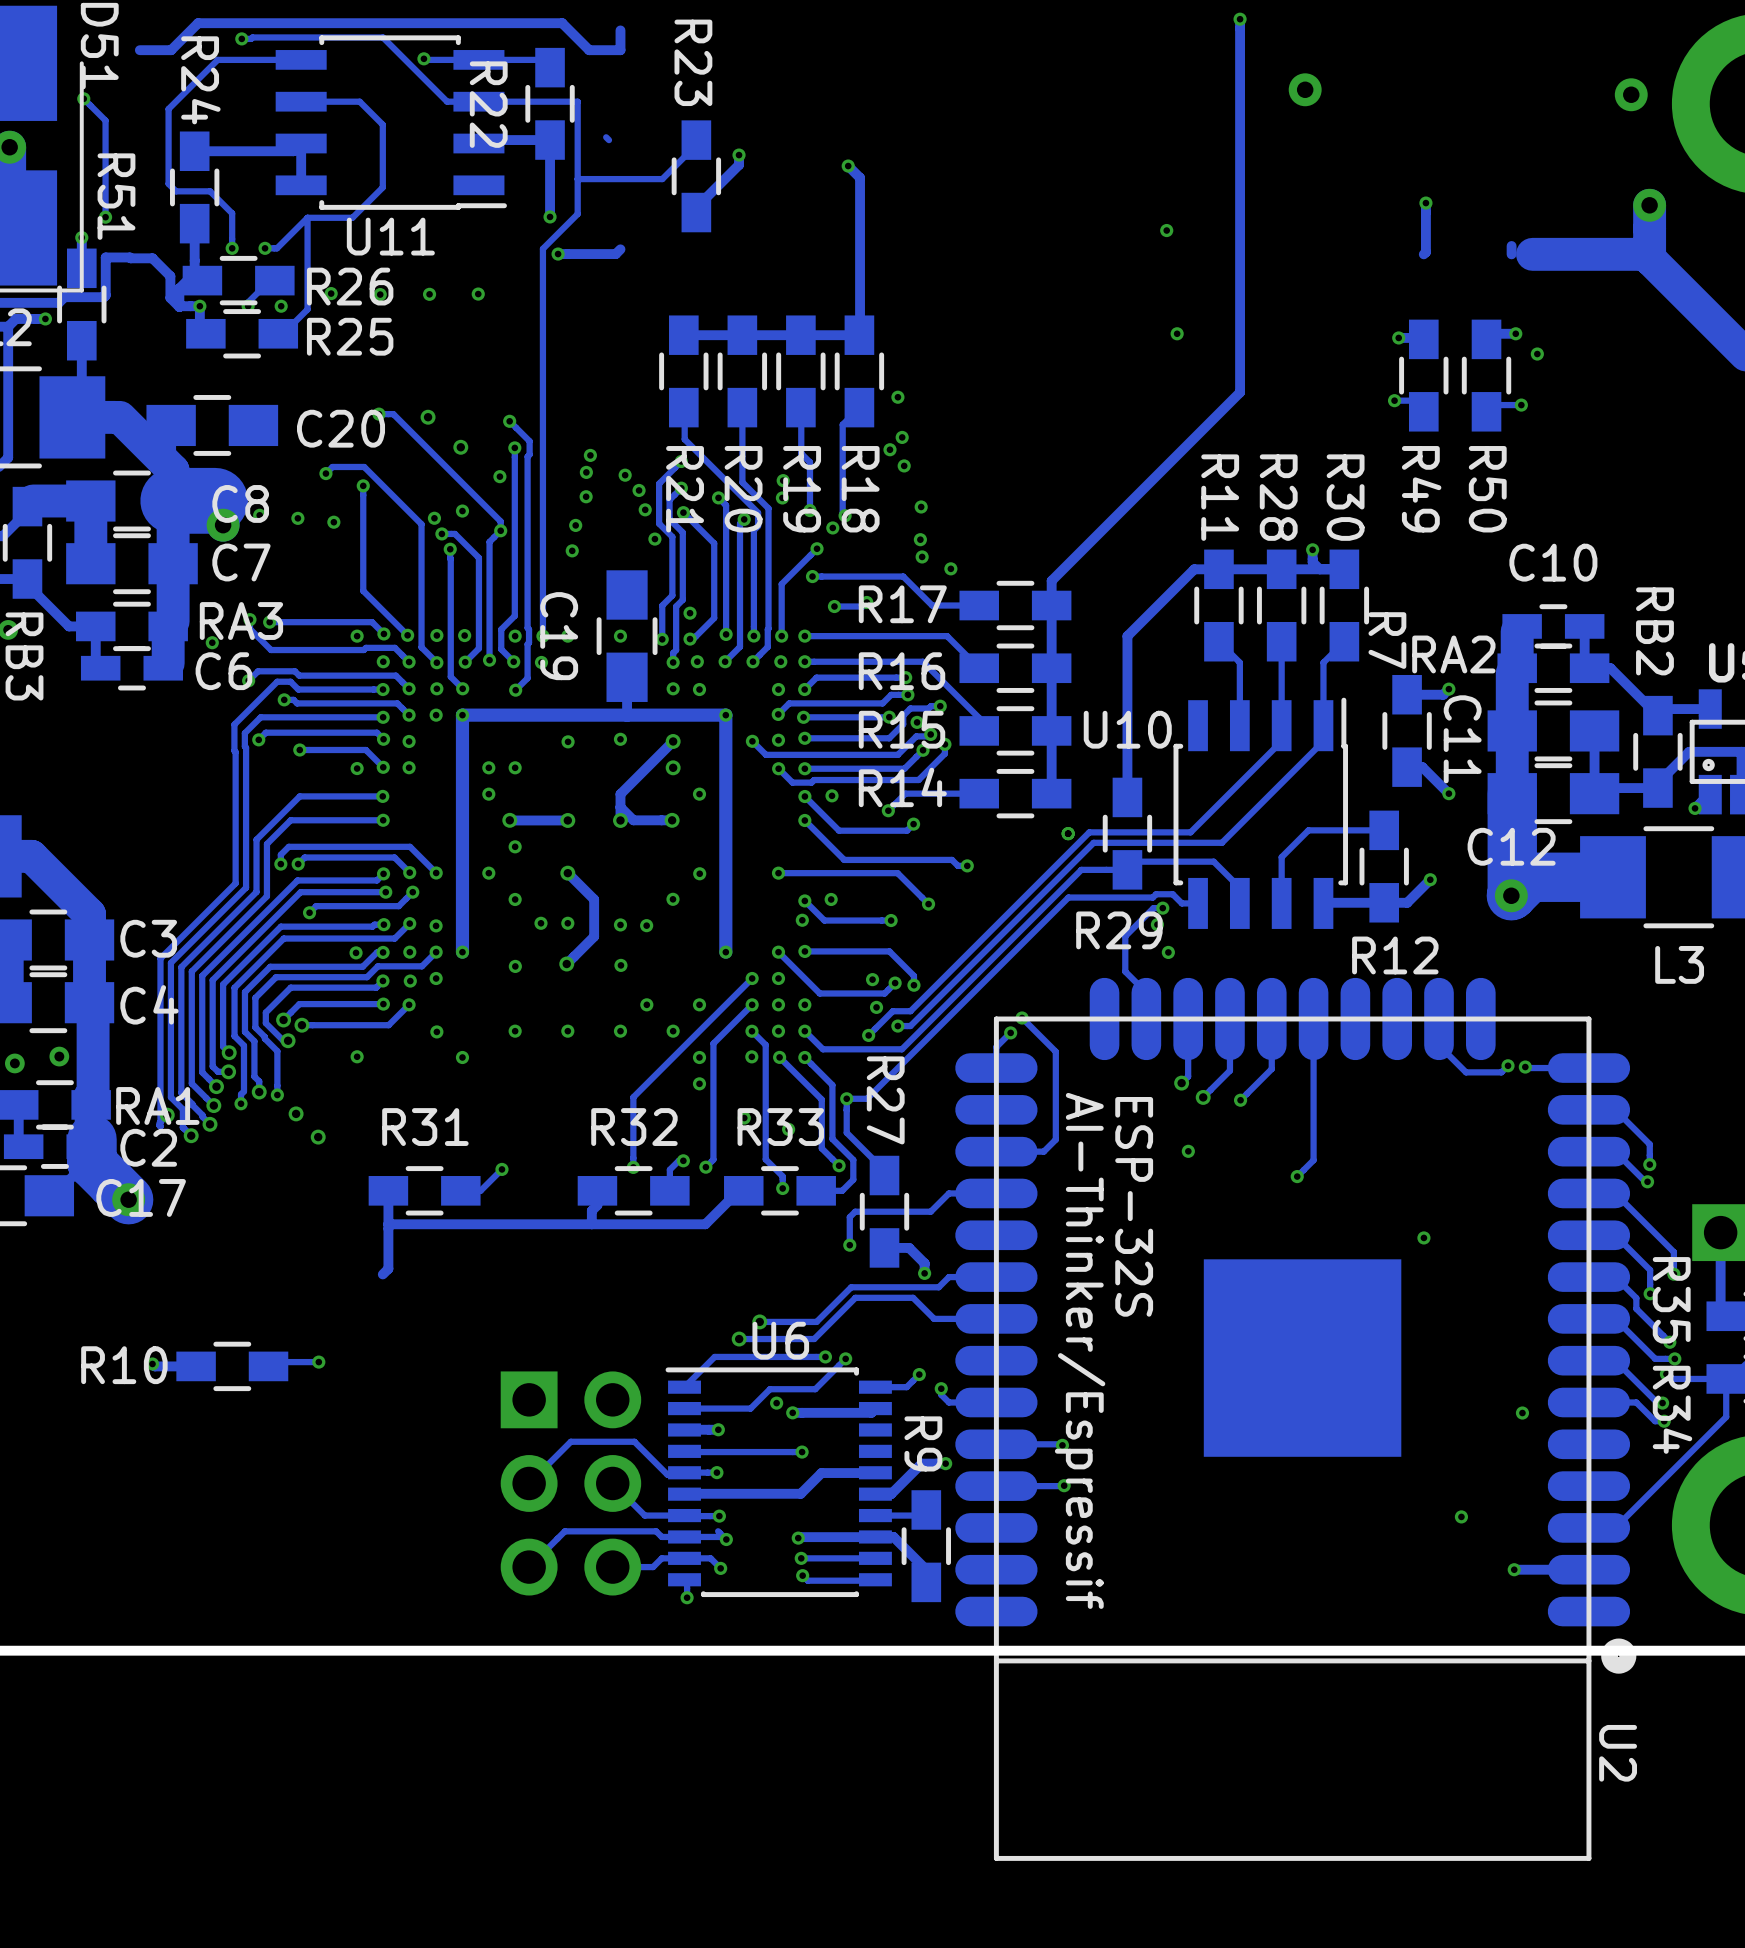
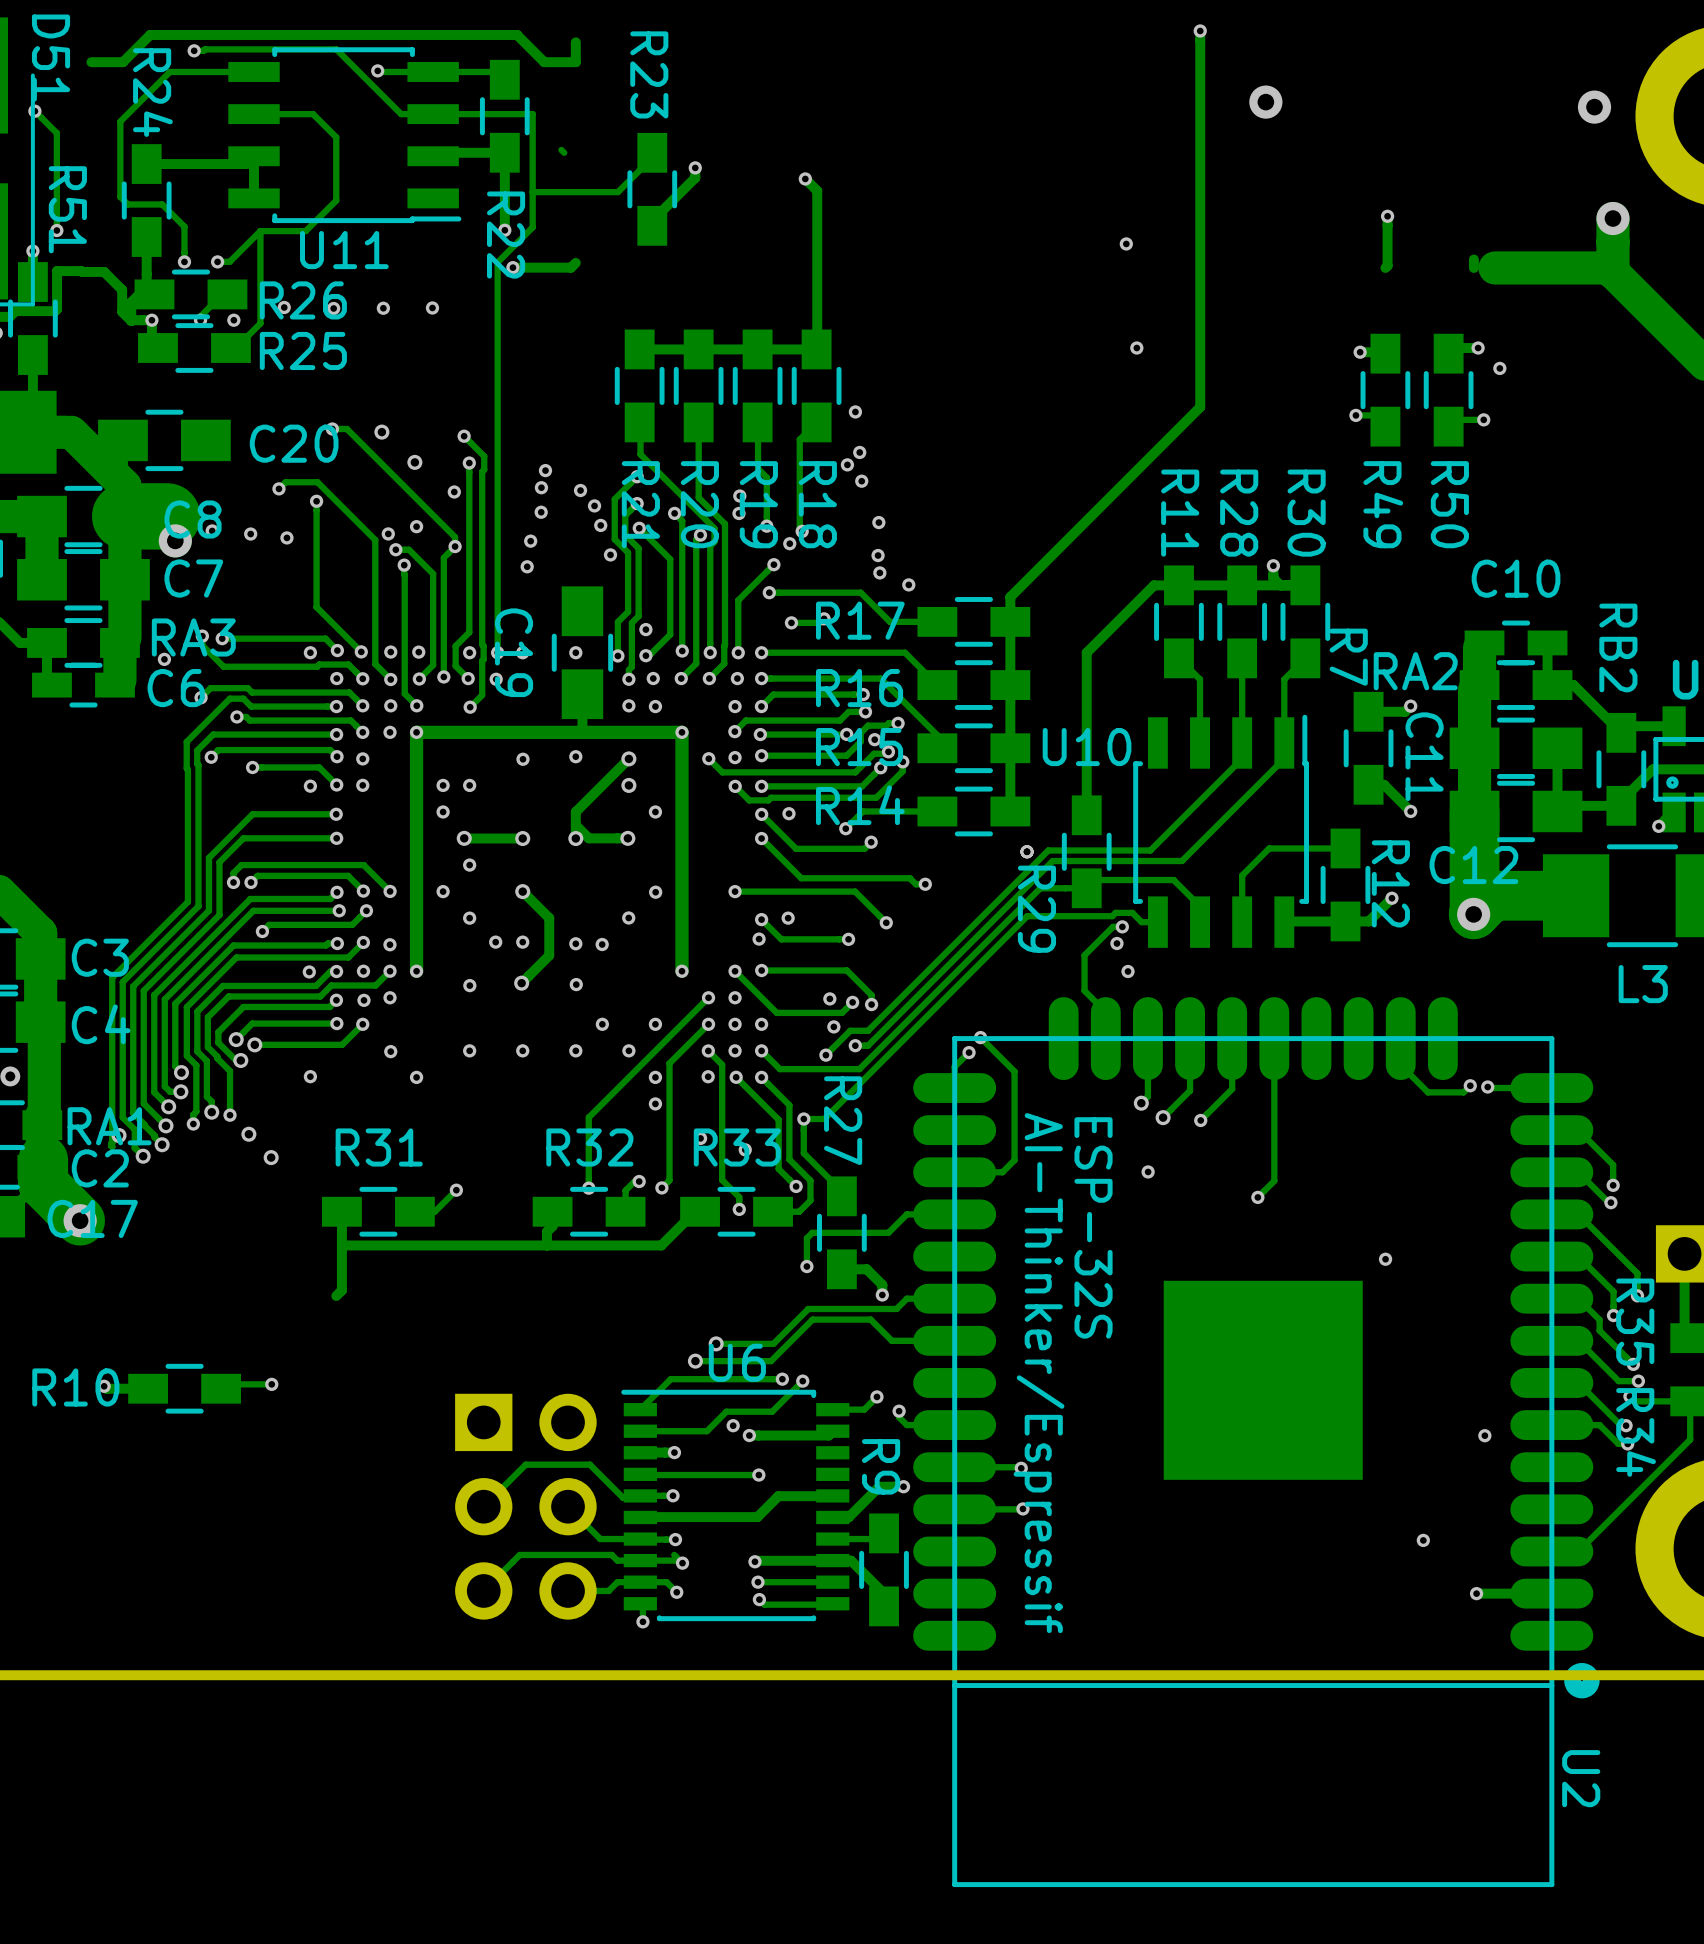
R22 name position: R22 (488, 104) -> R22 (506, 235)
R29 name rotation: 0° (1119, 930) -> 90° clockwise (1036, 909)
R12 name rotation: 0° (1395, 955) -> 90° clockwise (1390, 883)

